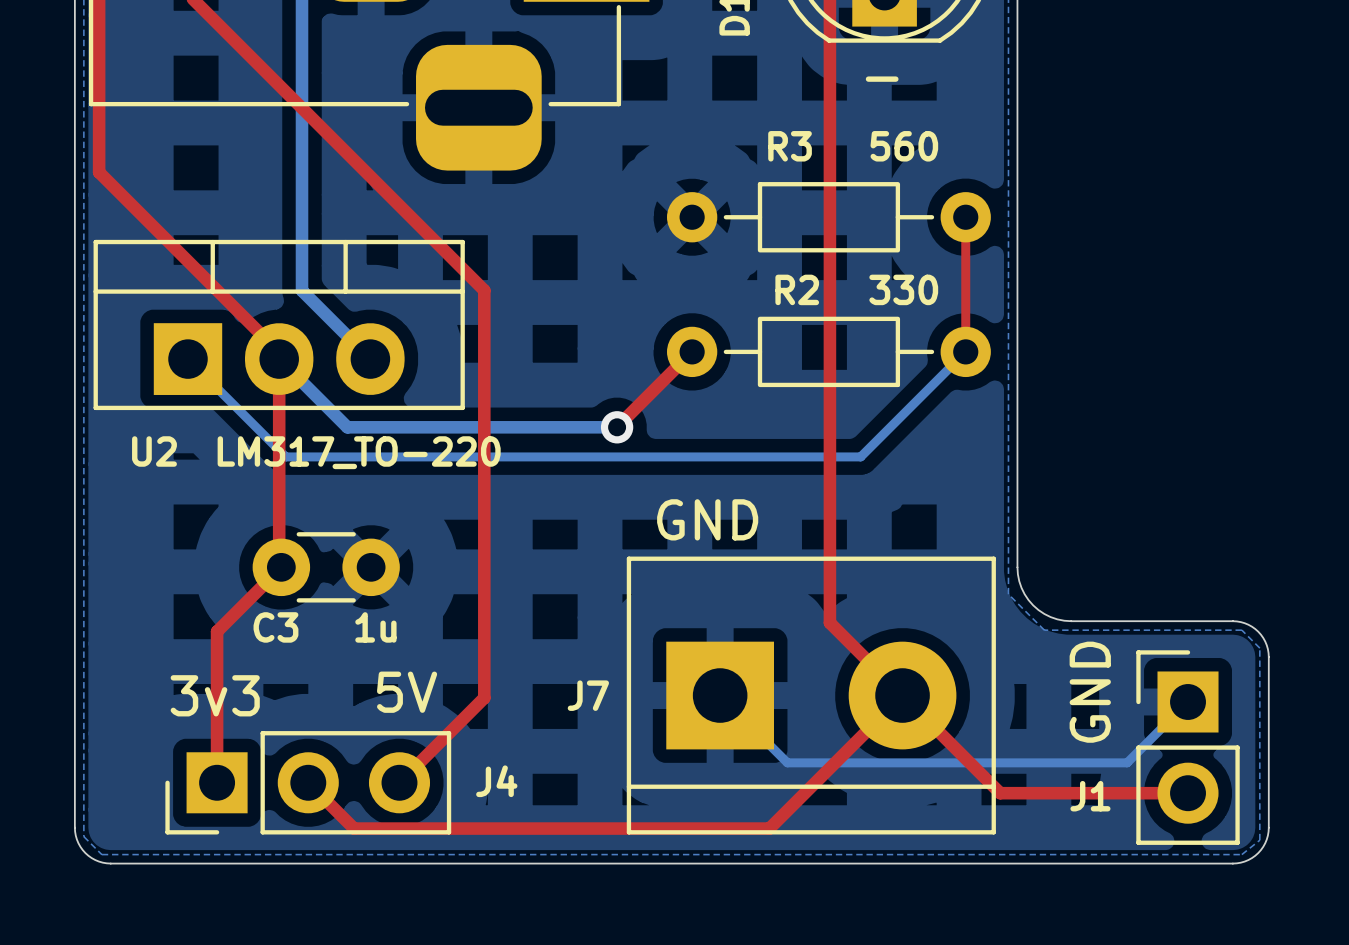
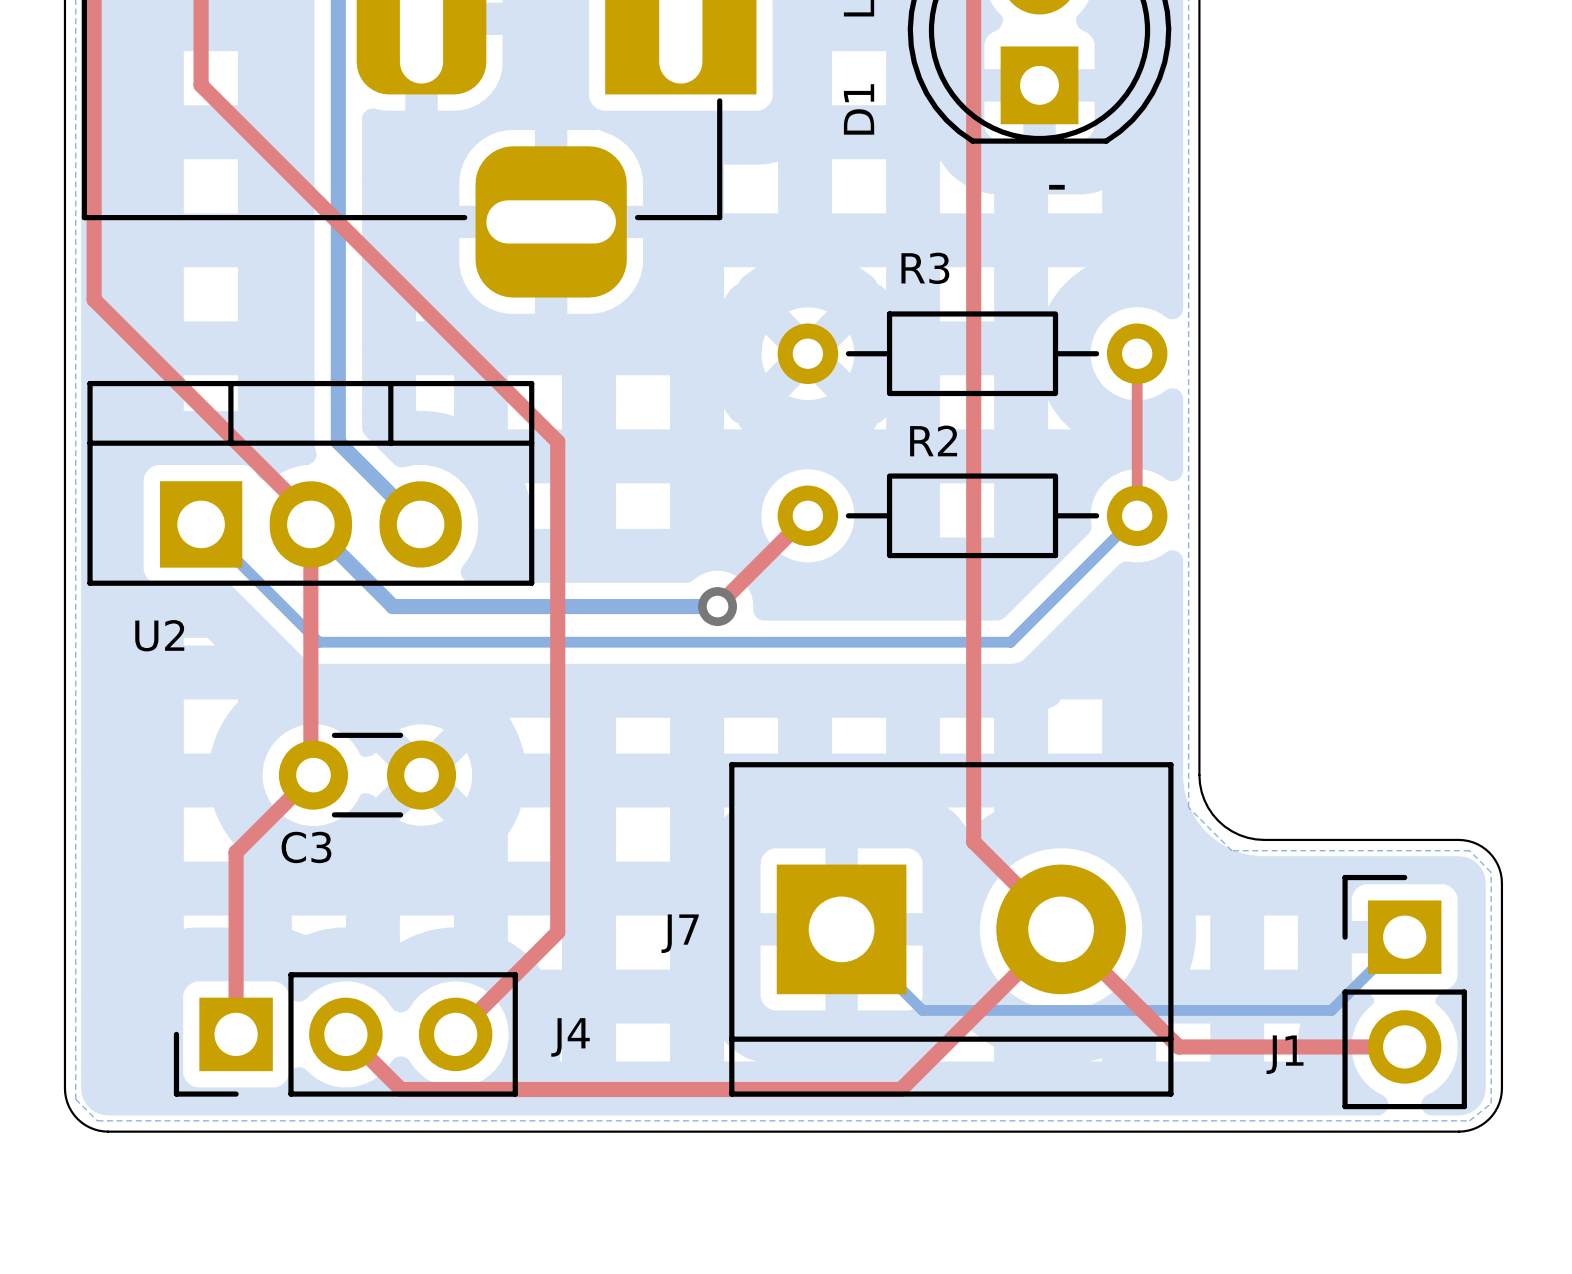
R3 value: 560 (904, 146) -> none
R2 value: 330 (903, 289) -> none
U2 value: LM317_TO-220 (359, 452) -> none
text: GND (707, 519) -> none
C3 value: 1u (375, 627) -> none
text: 5V (407, 692) -> none
text: GND (1090, 692) -> none
text: 3v3 (215, 695) -> none

